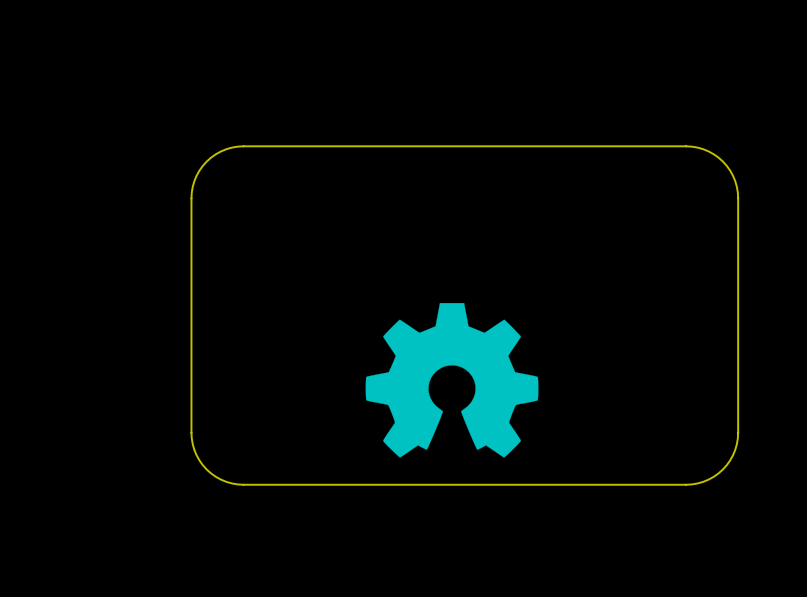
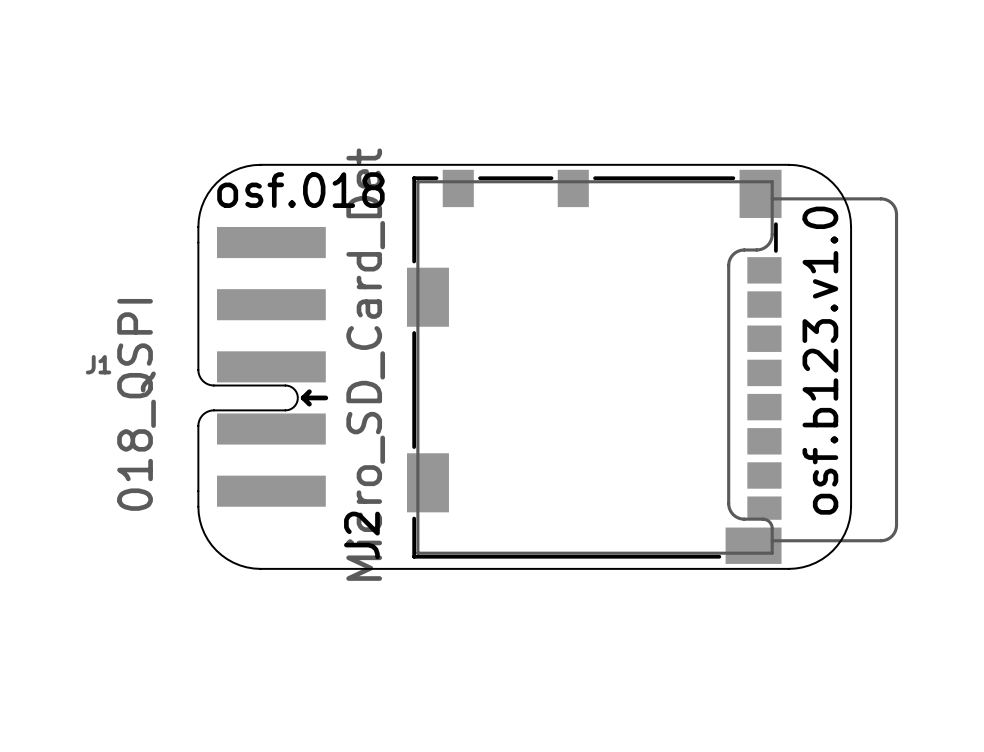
text: none -> osf.018 (300, 190)
board edge: (191, 211) (191, 419) -> none
drawing: [365, 303, 539, 458] -> none
text: none -> osf.b123.v1.0 (820, 360)
J1: none -> 018_QSPI (262, 366)
J2: none -> Micro_SD_Card_Det (652, 366)

